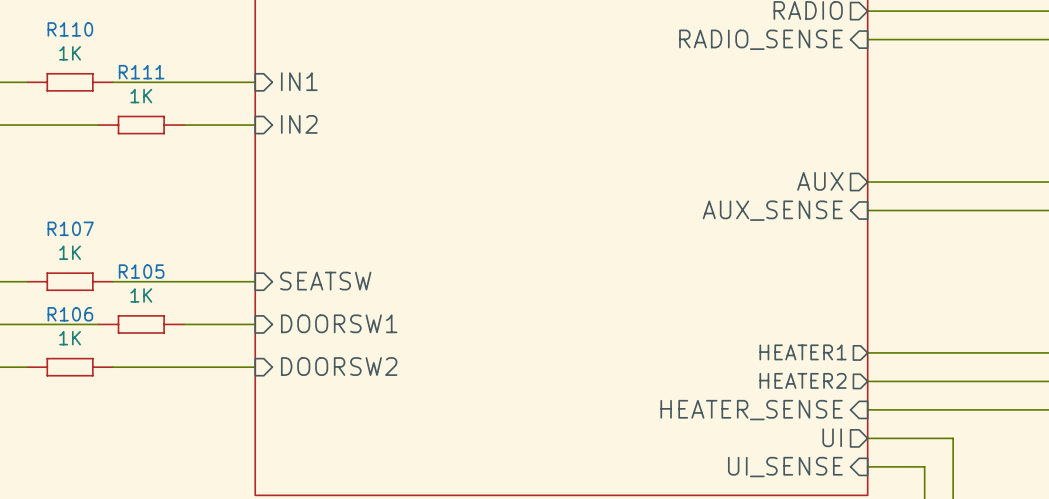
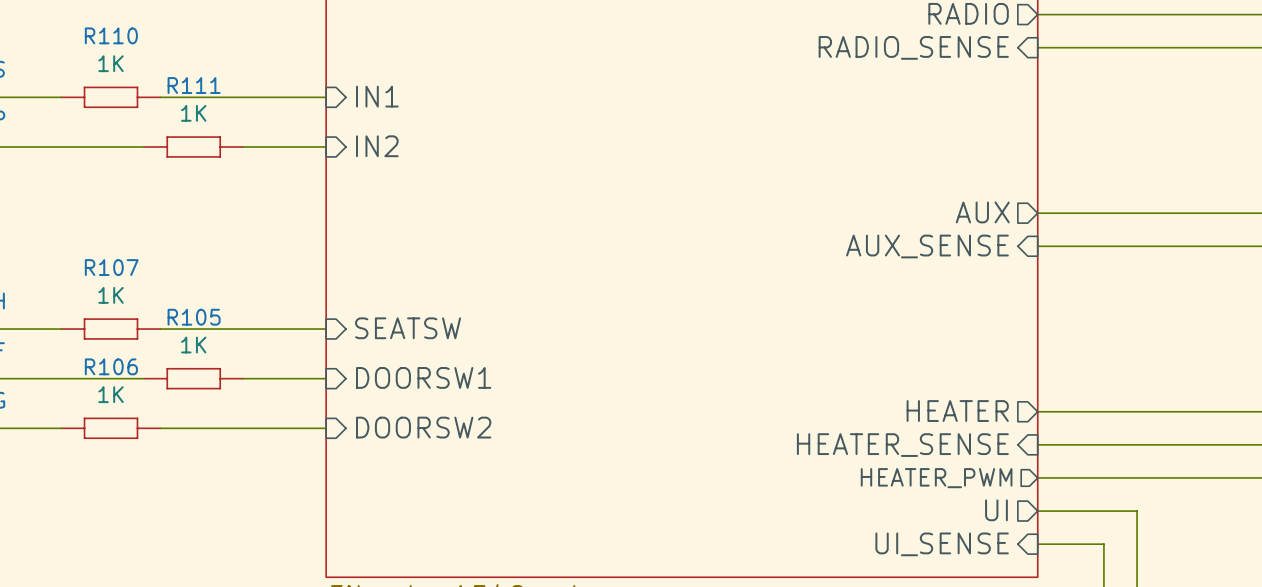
sheet pin: HEATER1 (803, 352) -> HEATER (957, 411)
sheet pin shape: output (803, 380) -> input (902, 445)
sheet pin: HEATER2 (803, 380) -> HEATER_SENSE (902, 445)
sheet pin shape: input (751, 410) -> output (936, 478)
sheet pin: HEATER_SENSE (751, 410) -> HEATER_PWM (936, 478)

